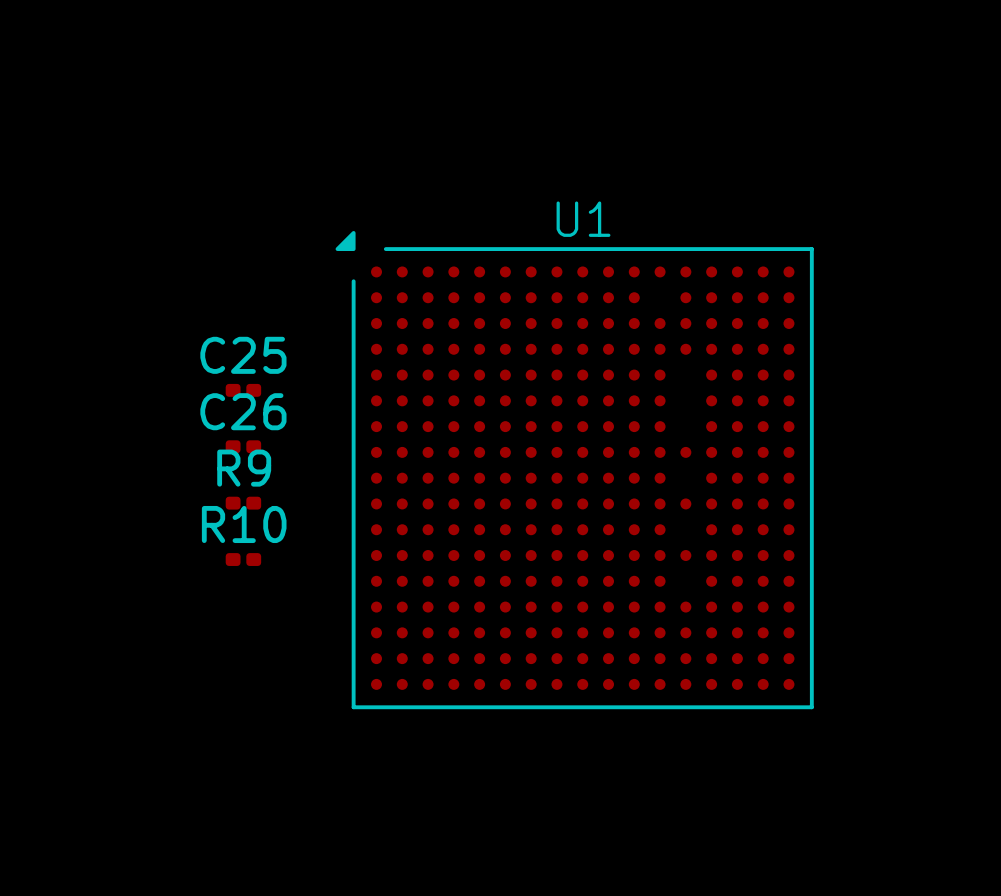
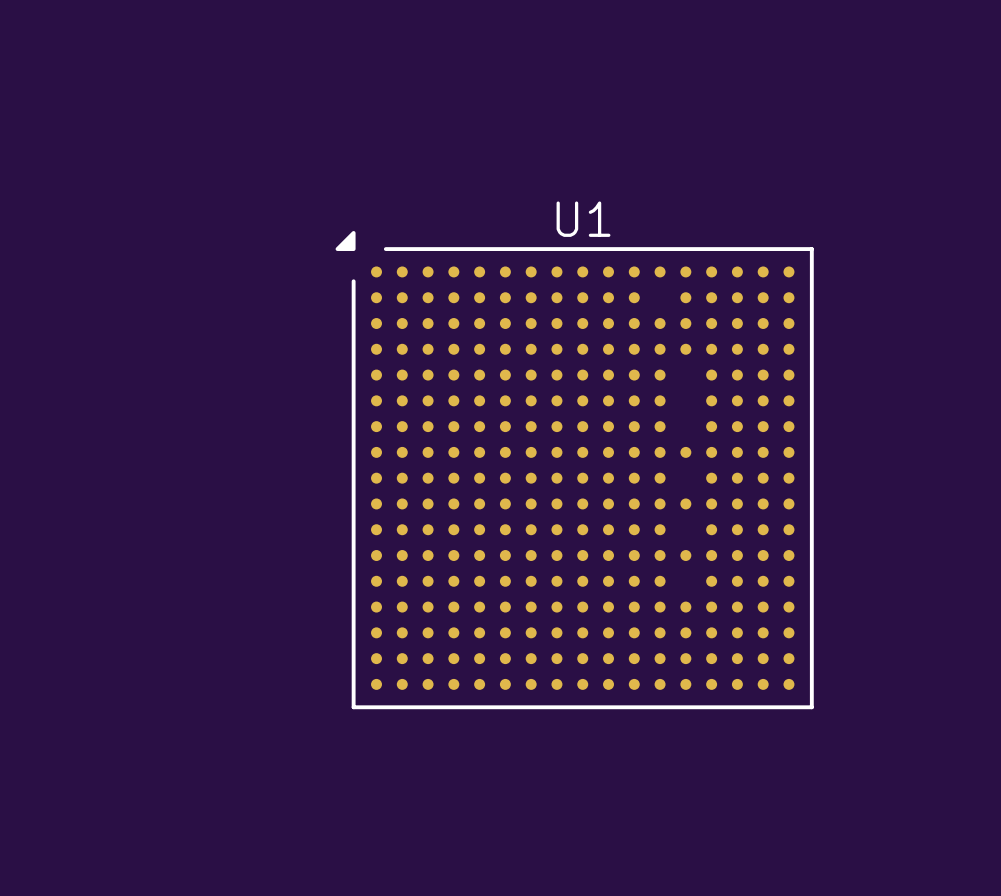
C25: (243, 390) -> none
C26: (243, 446) -> none
R9: (243, 503) -> none
R10: (243, 559) -> none

